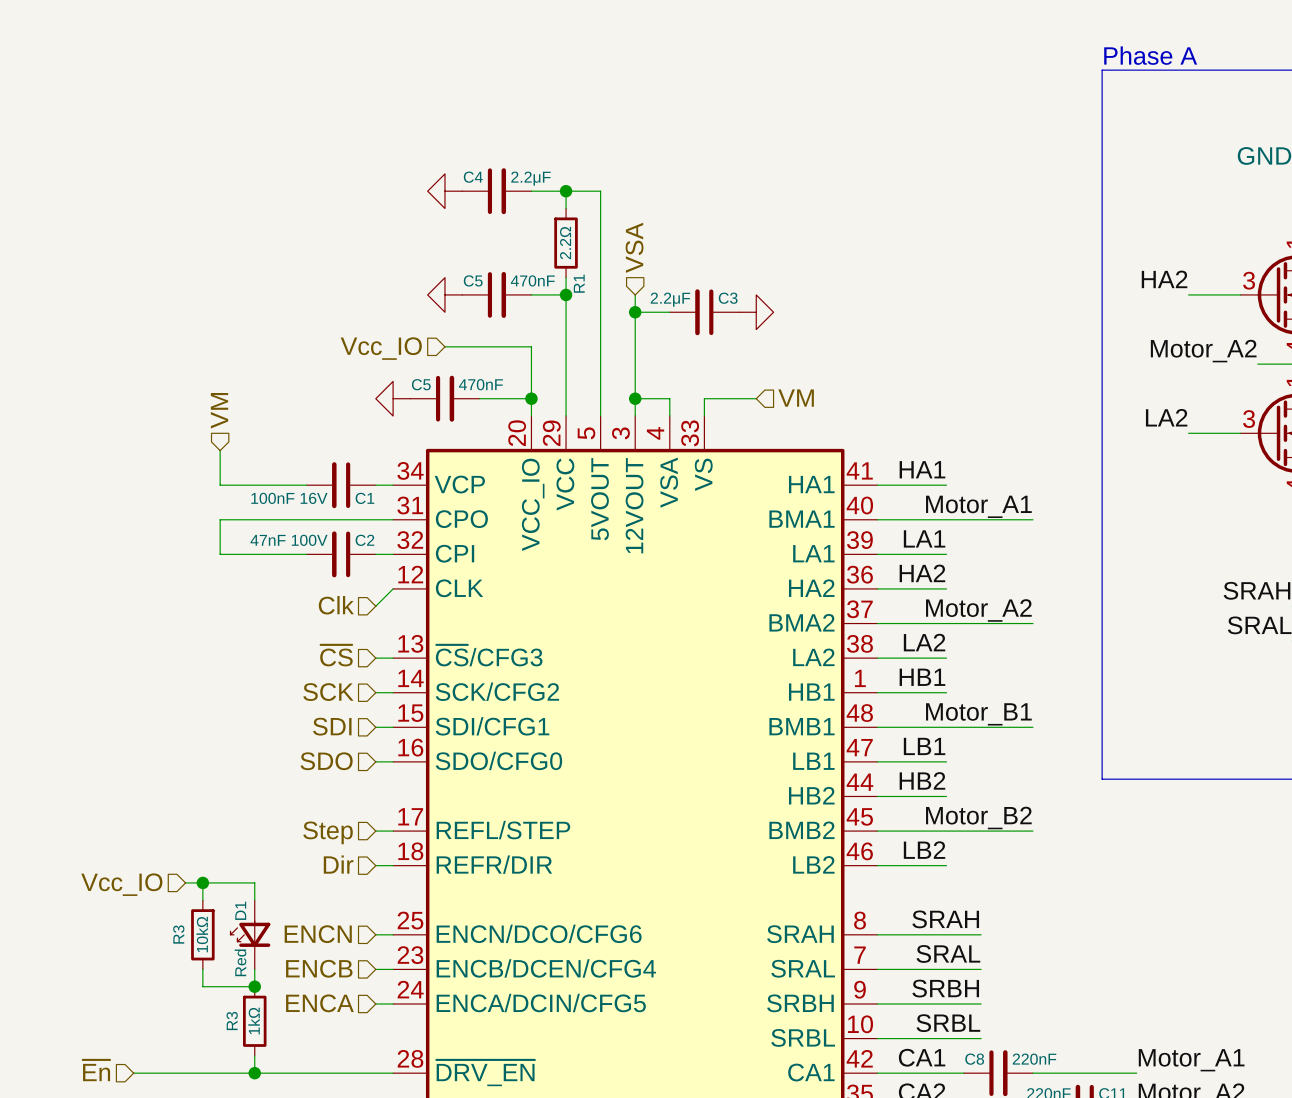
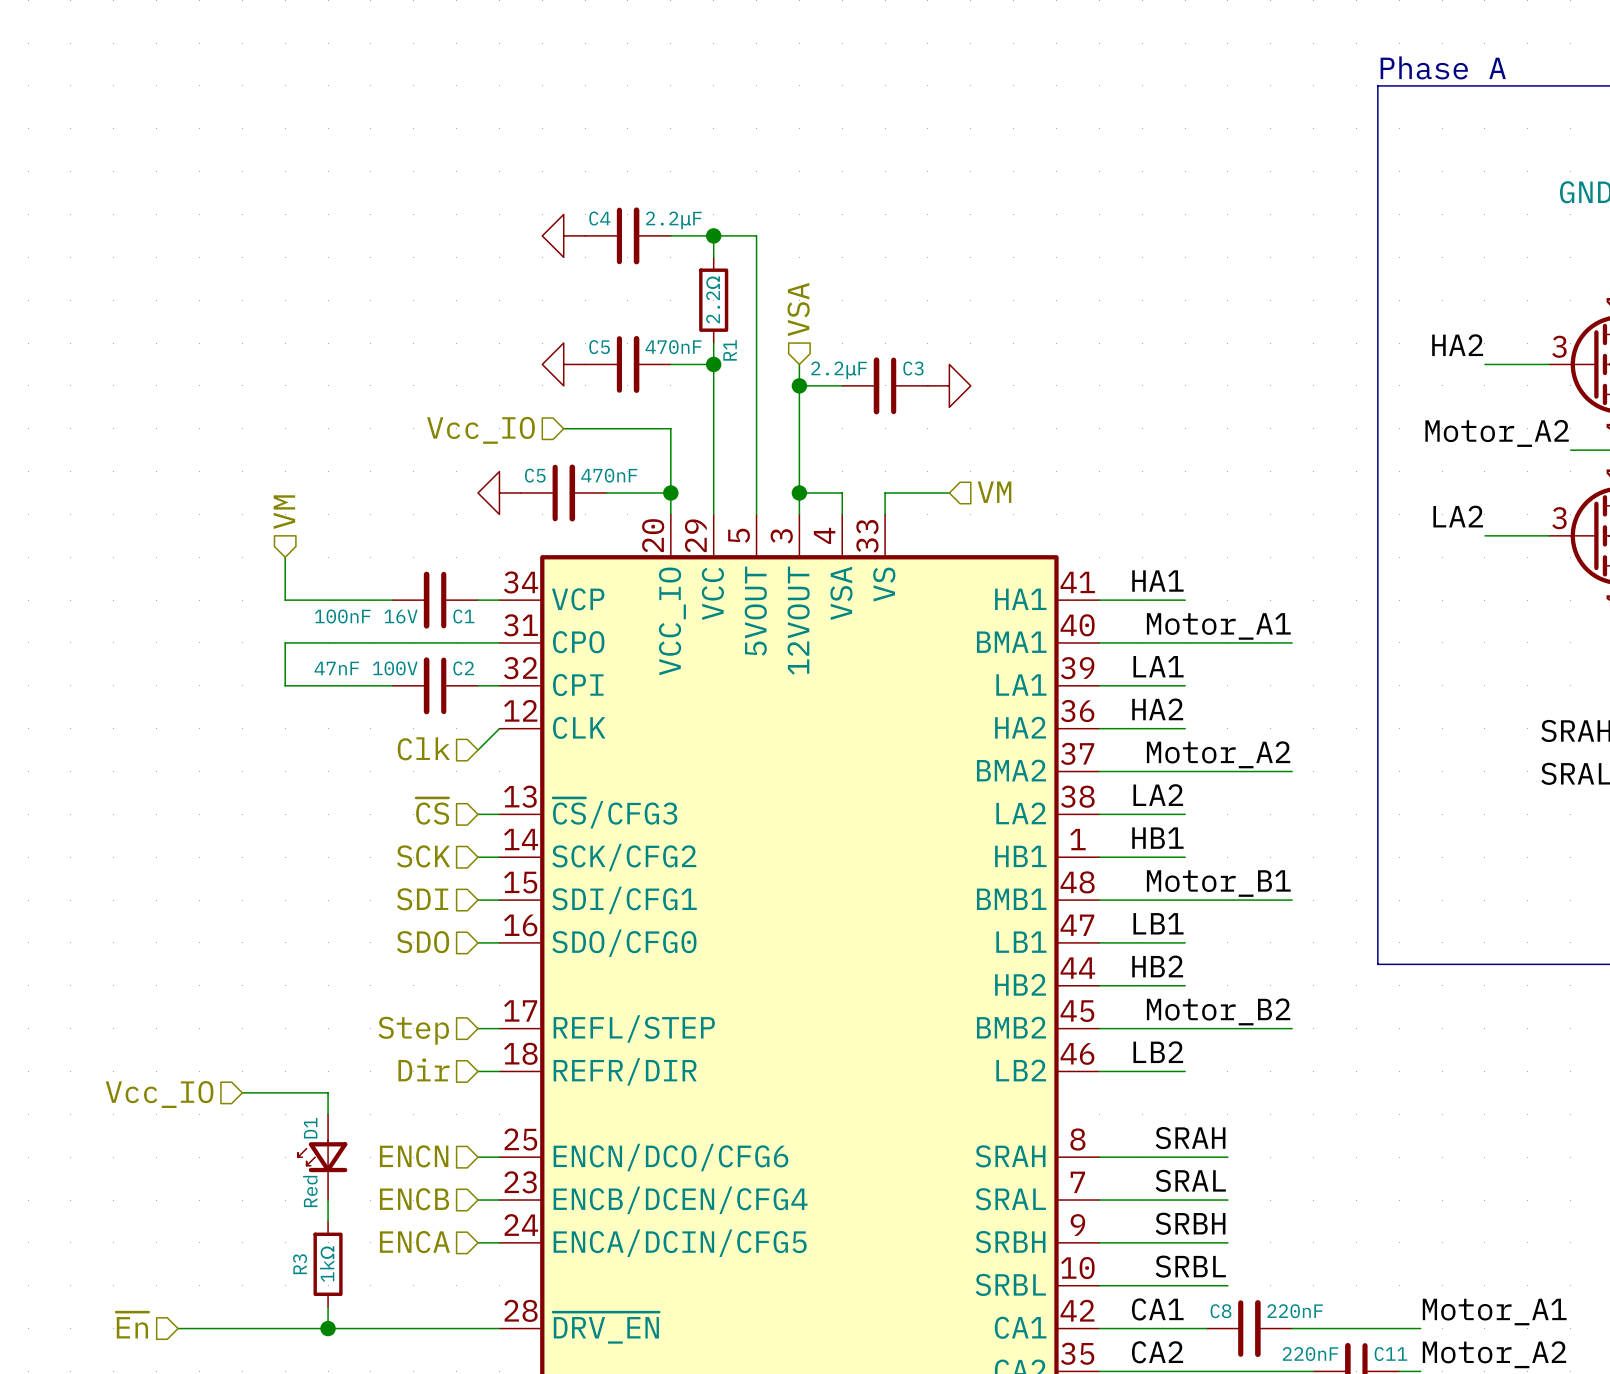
wire: (202, 882) (202, 900) -> none
junction: (202, 882) -> none
R3: 10kΩ (202, 934) -> none
wire: (202, 969) (202, 986) (254, 986) -> none
junction: (254, 986) -> none

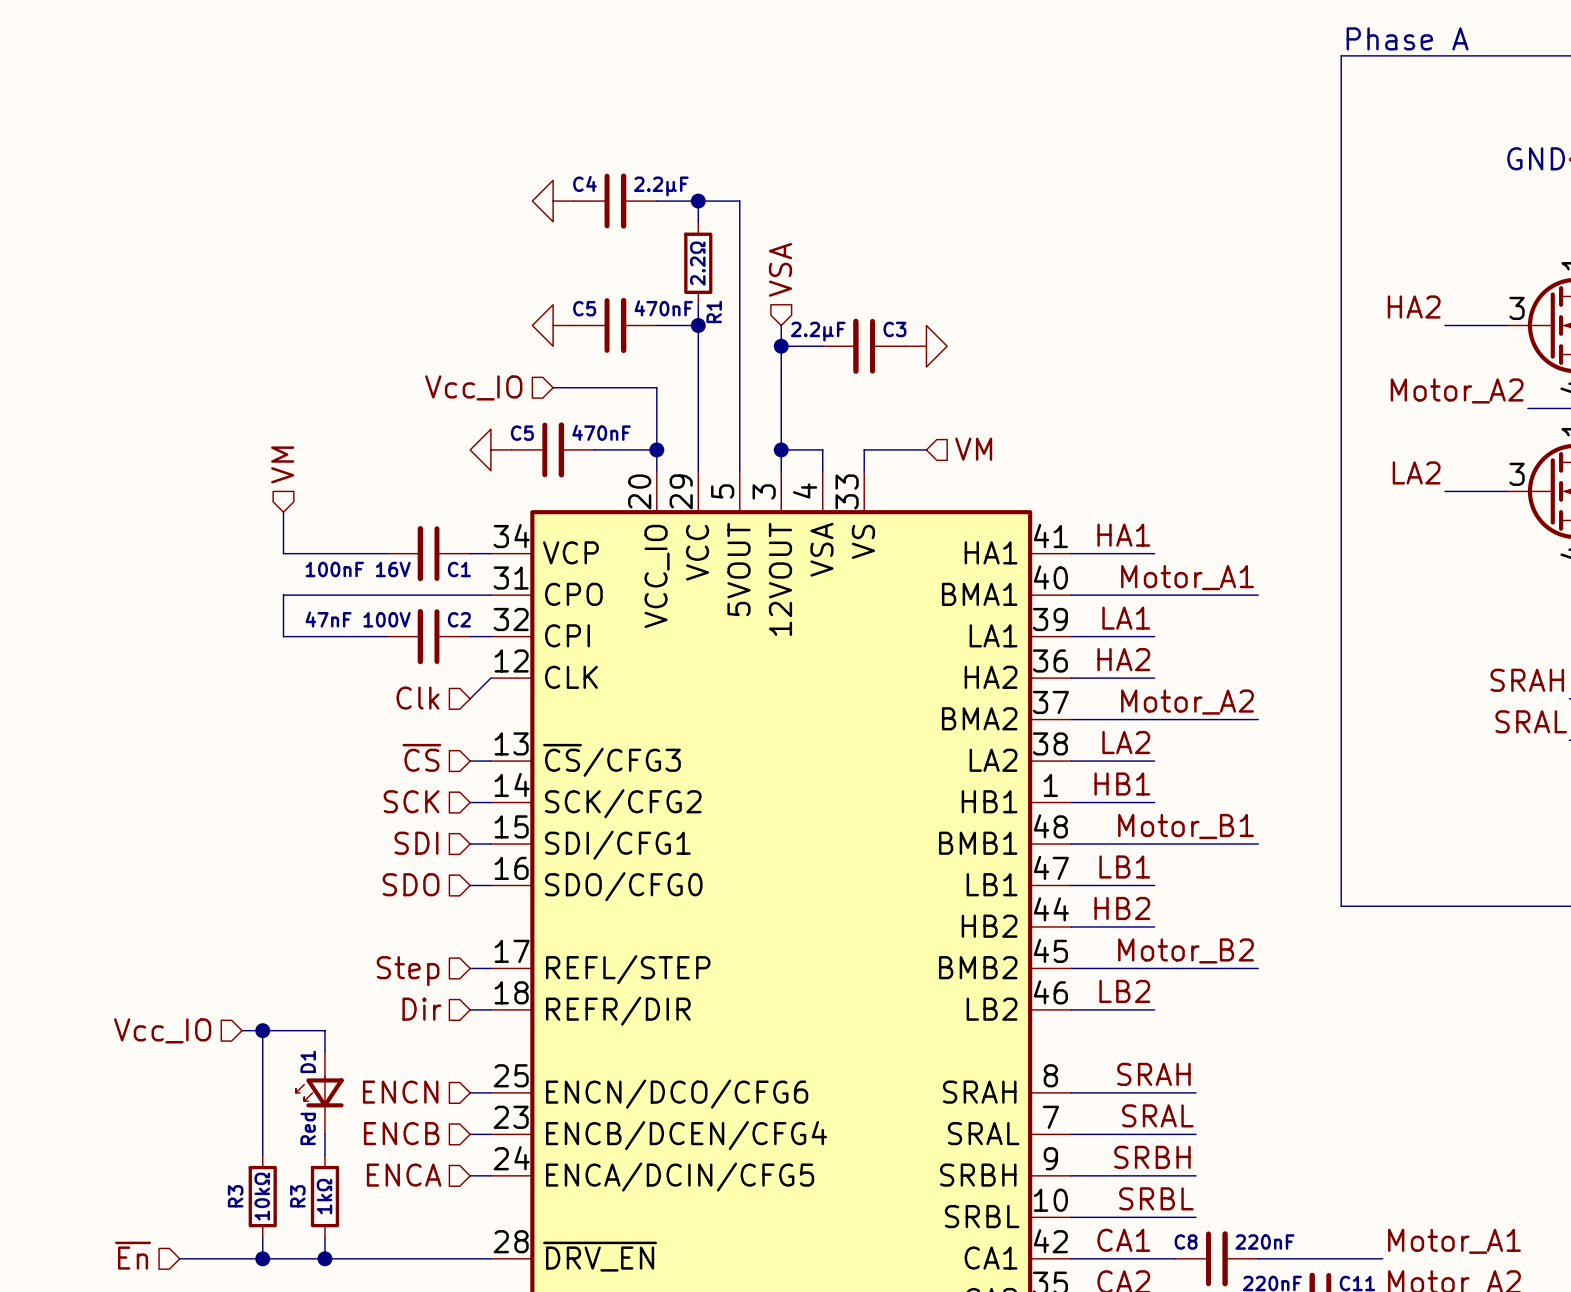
wire: none -> (262, 1030) (262, 1155)
junction: none -> (262, 1030)
R3: none -> 10kΩ (262, 1196)
wire: none -> (262, 1238) (262, 1258)
junction: none -> (262, 1258)

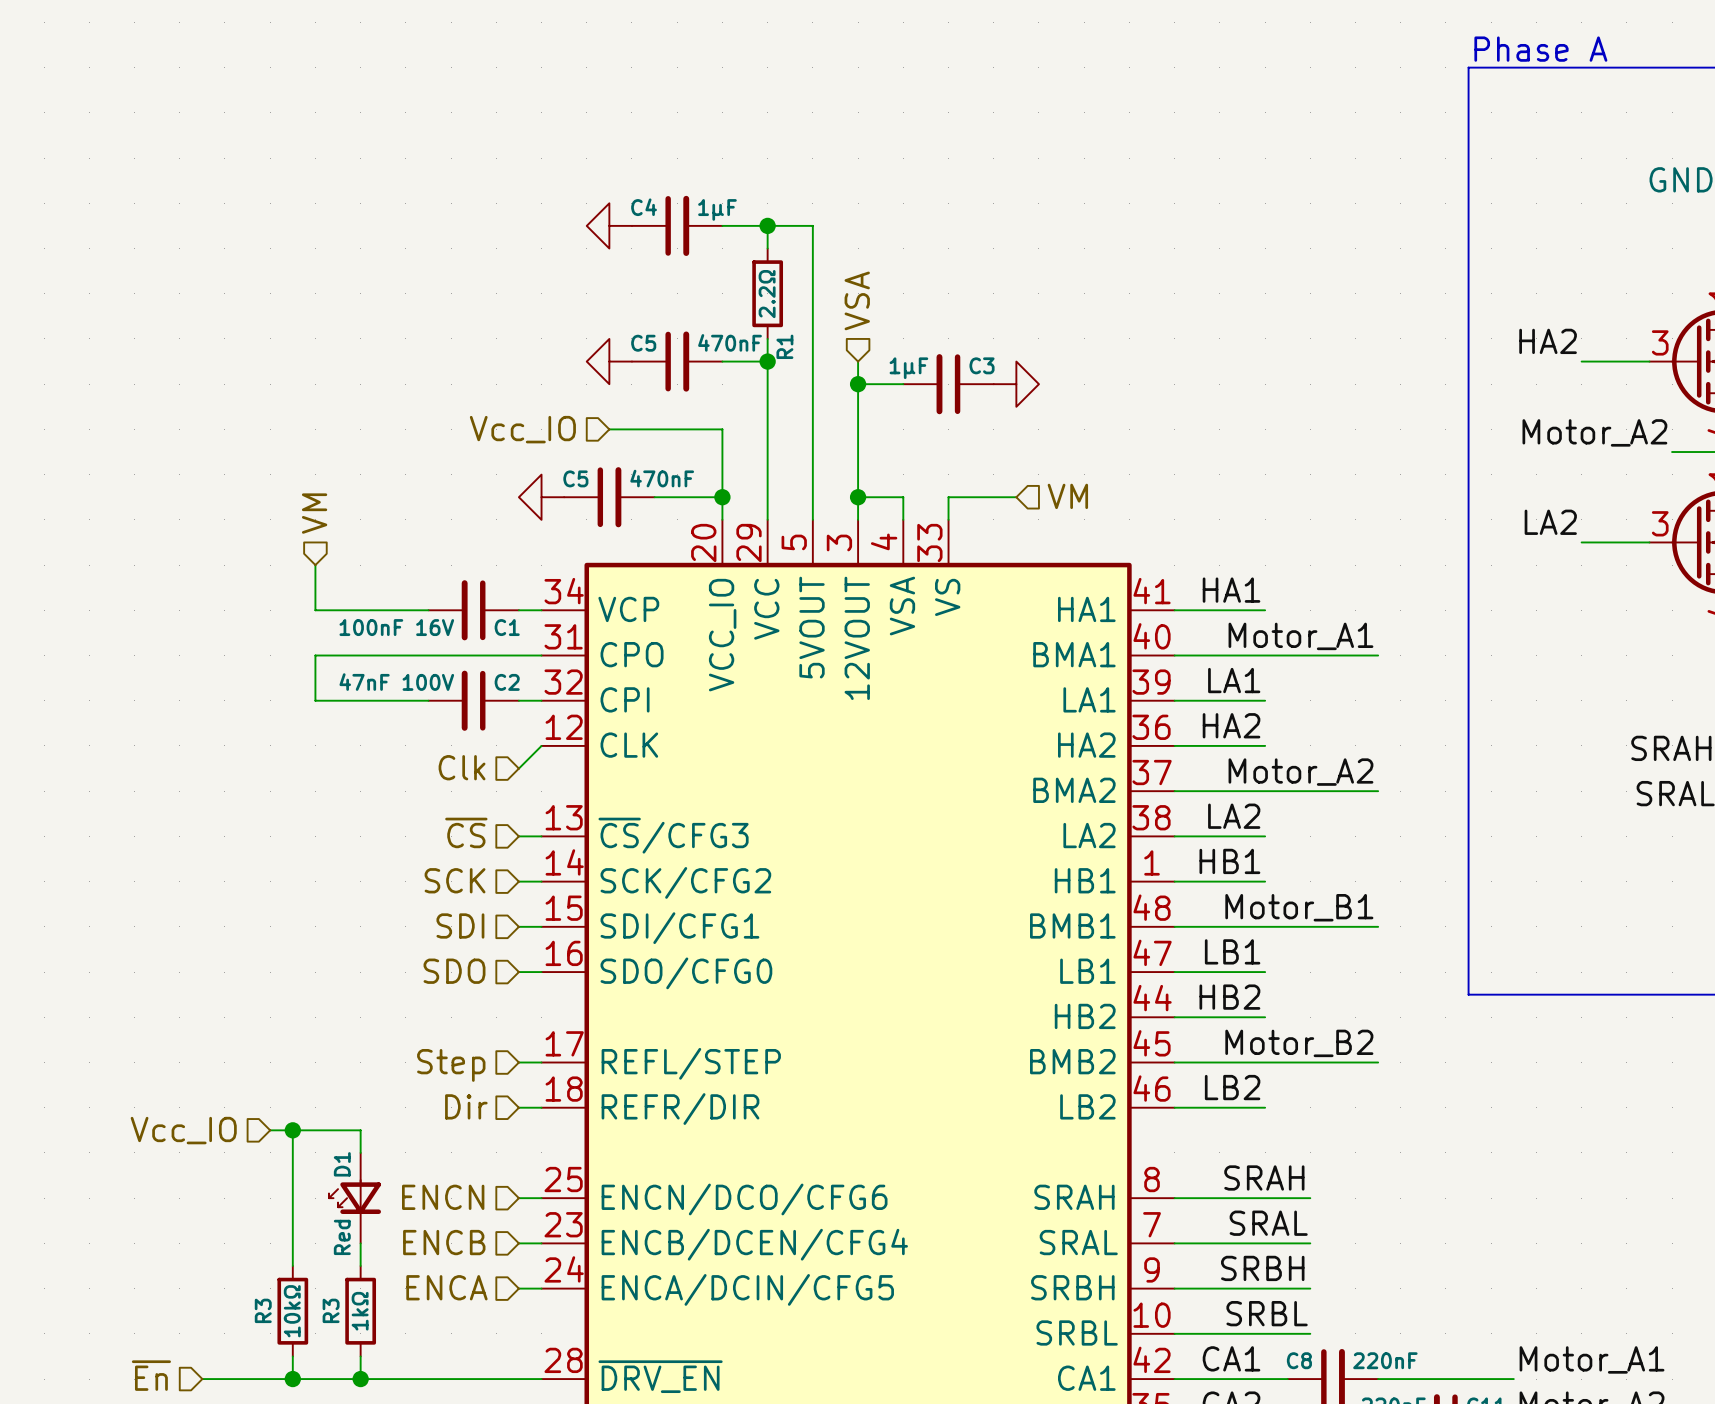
C4 value: 2.2μF (661, 186) -> 1μF (717, 209)
C3 value: 2.2μF (818, 331) -> 1μF (908, 368)

